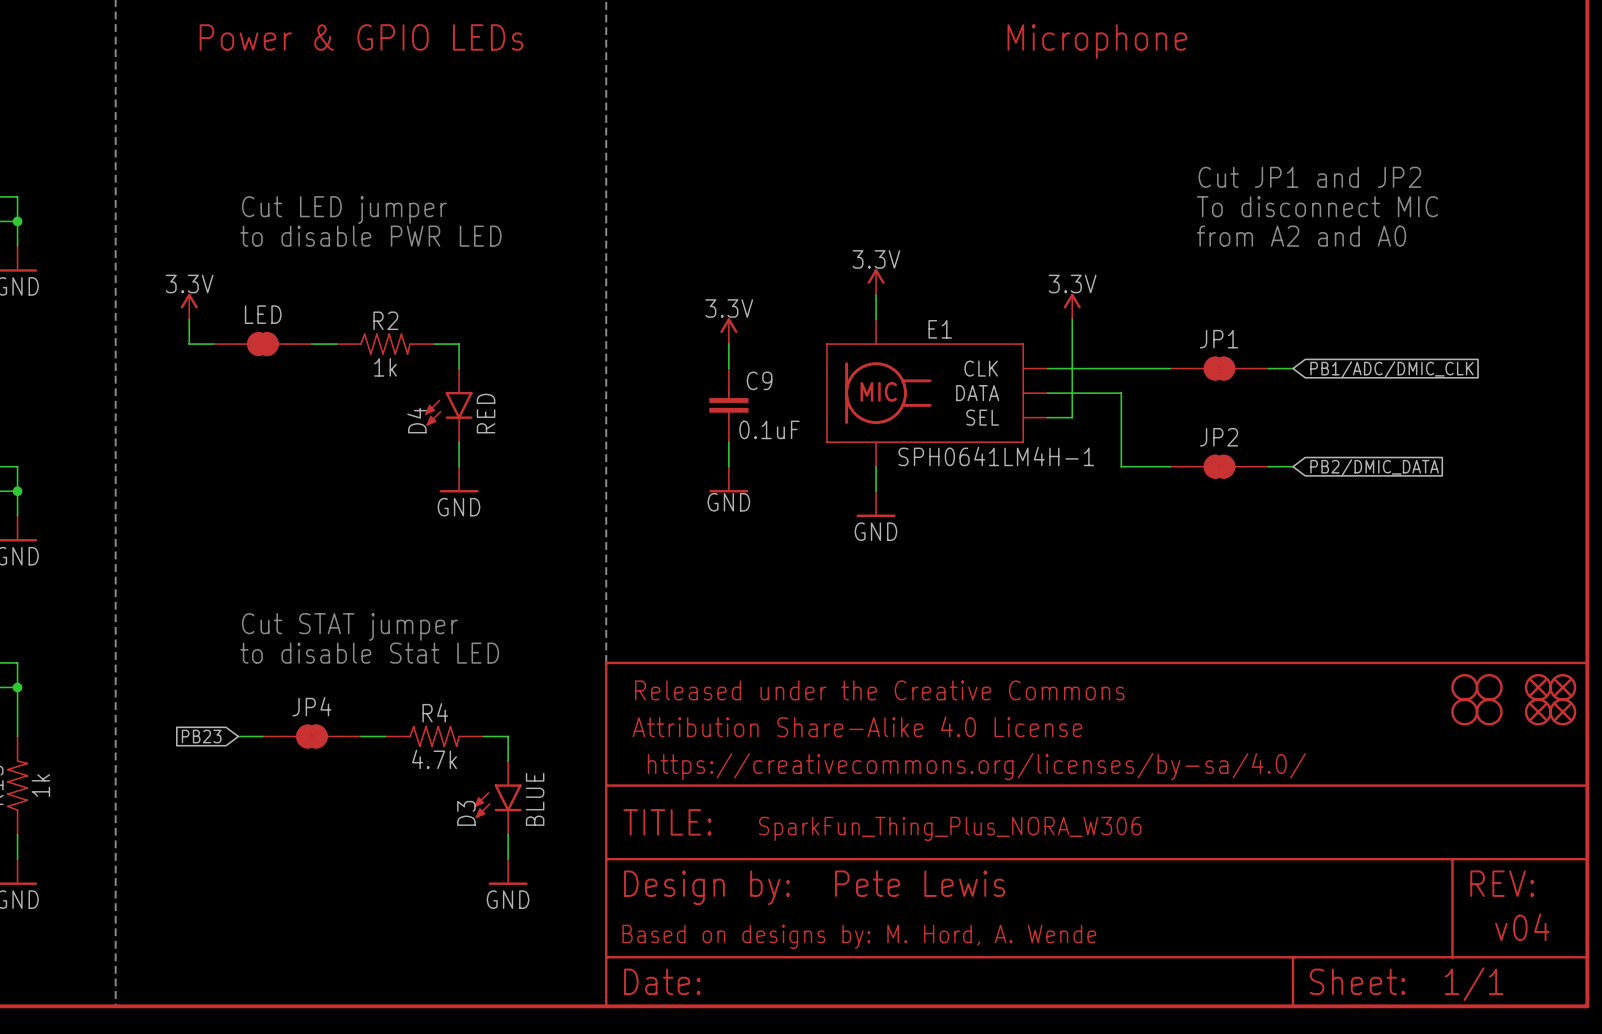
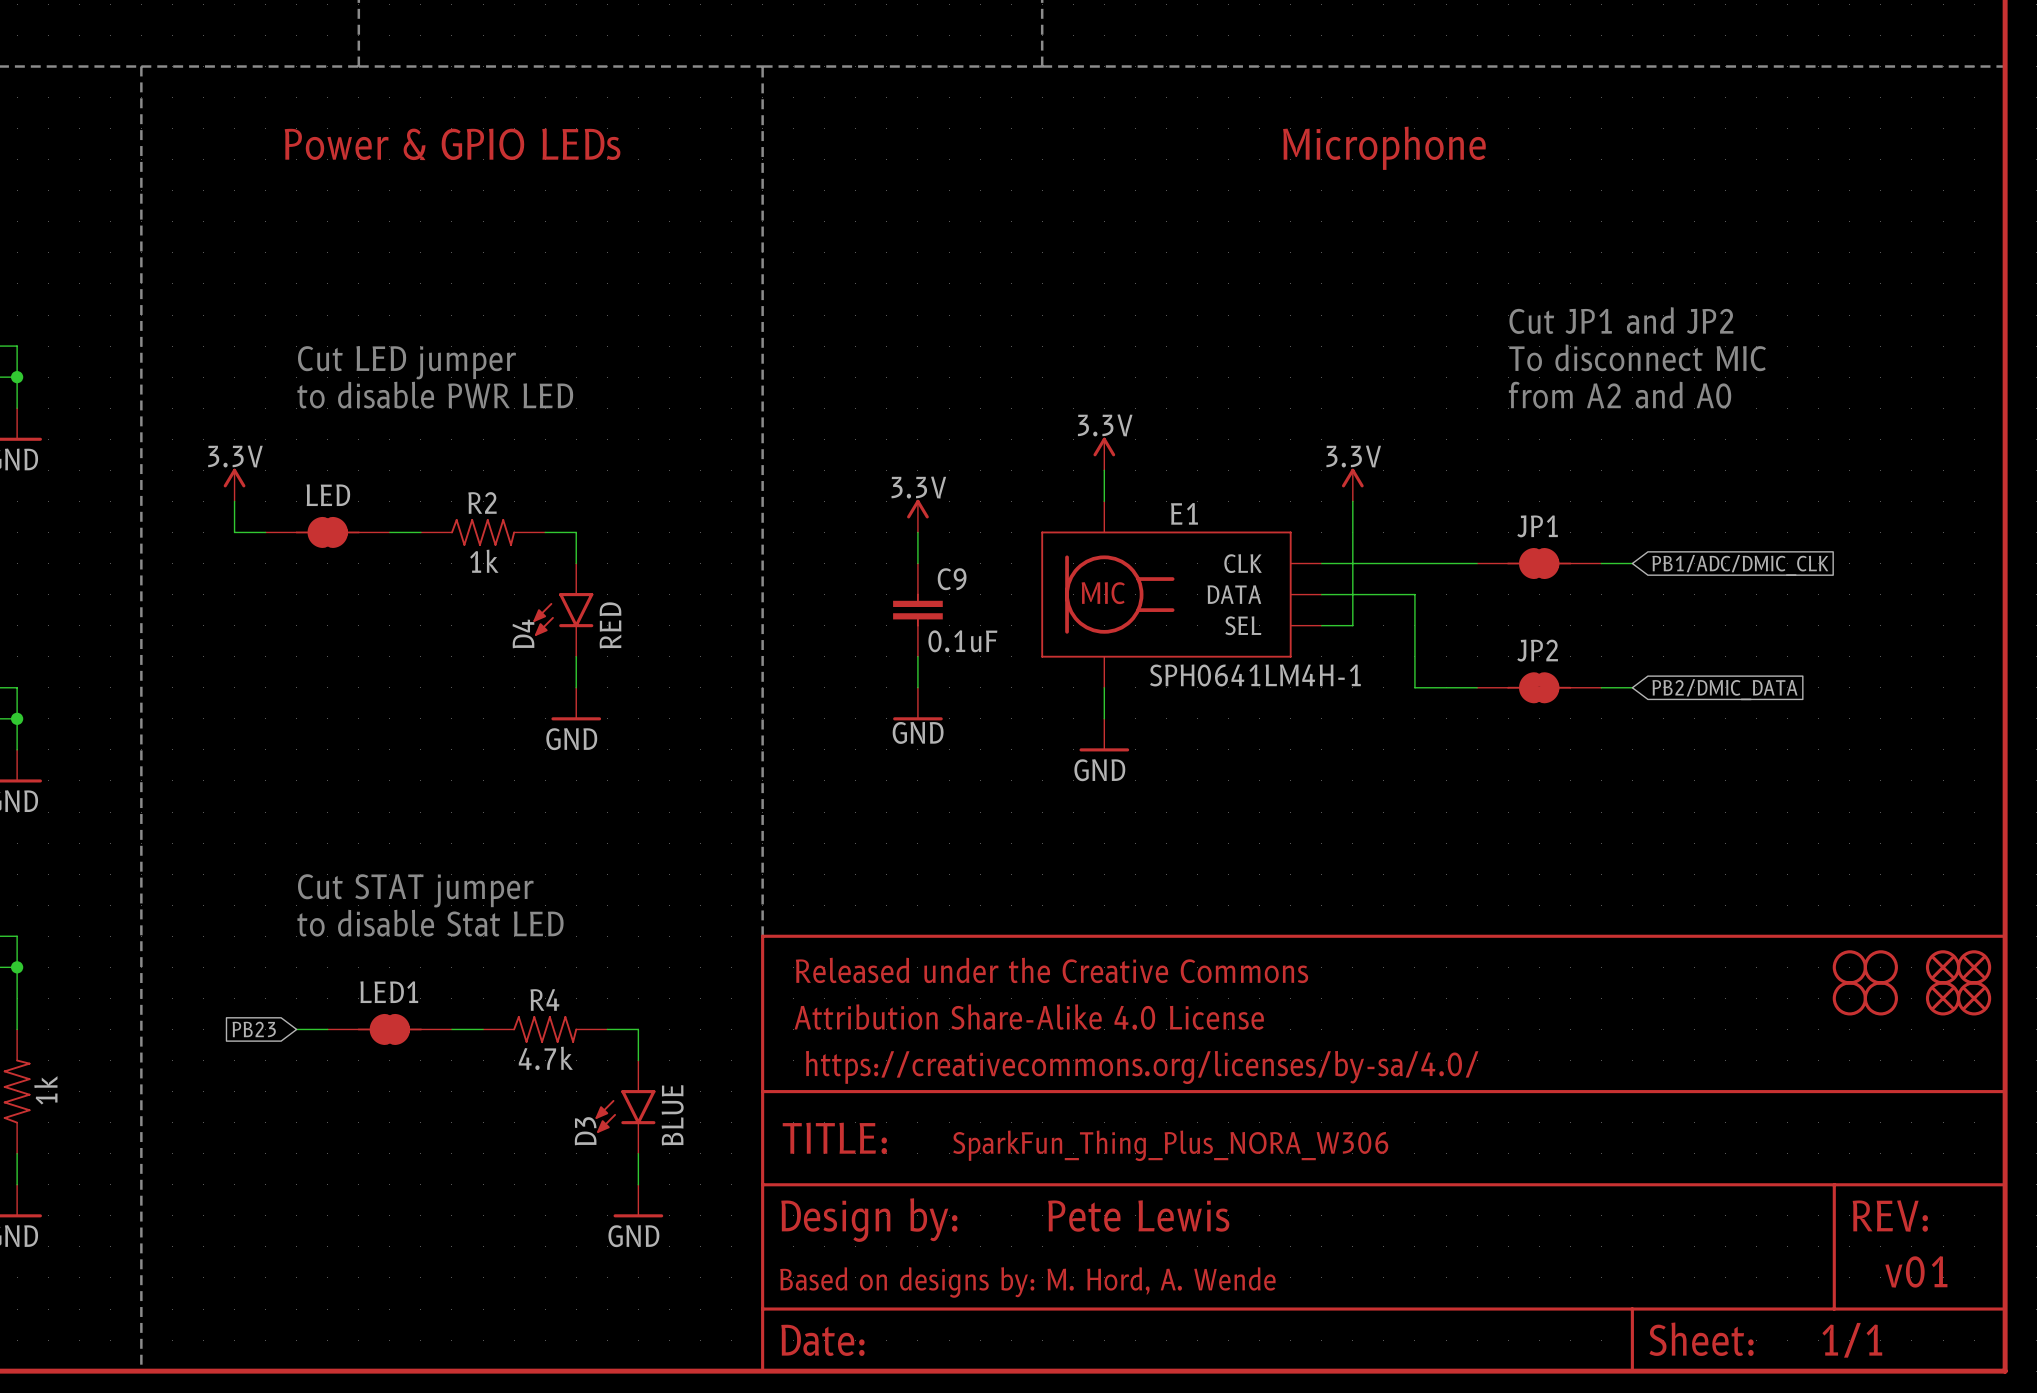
JP4 name: JP4 (311, 706) -> LED1 (389, 992)
text: v04 (1522, 927) -> v01 (1916, 1271)

